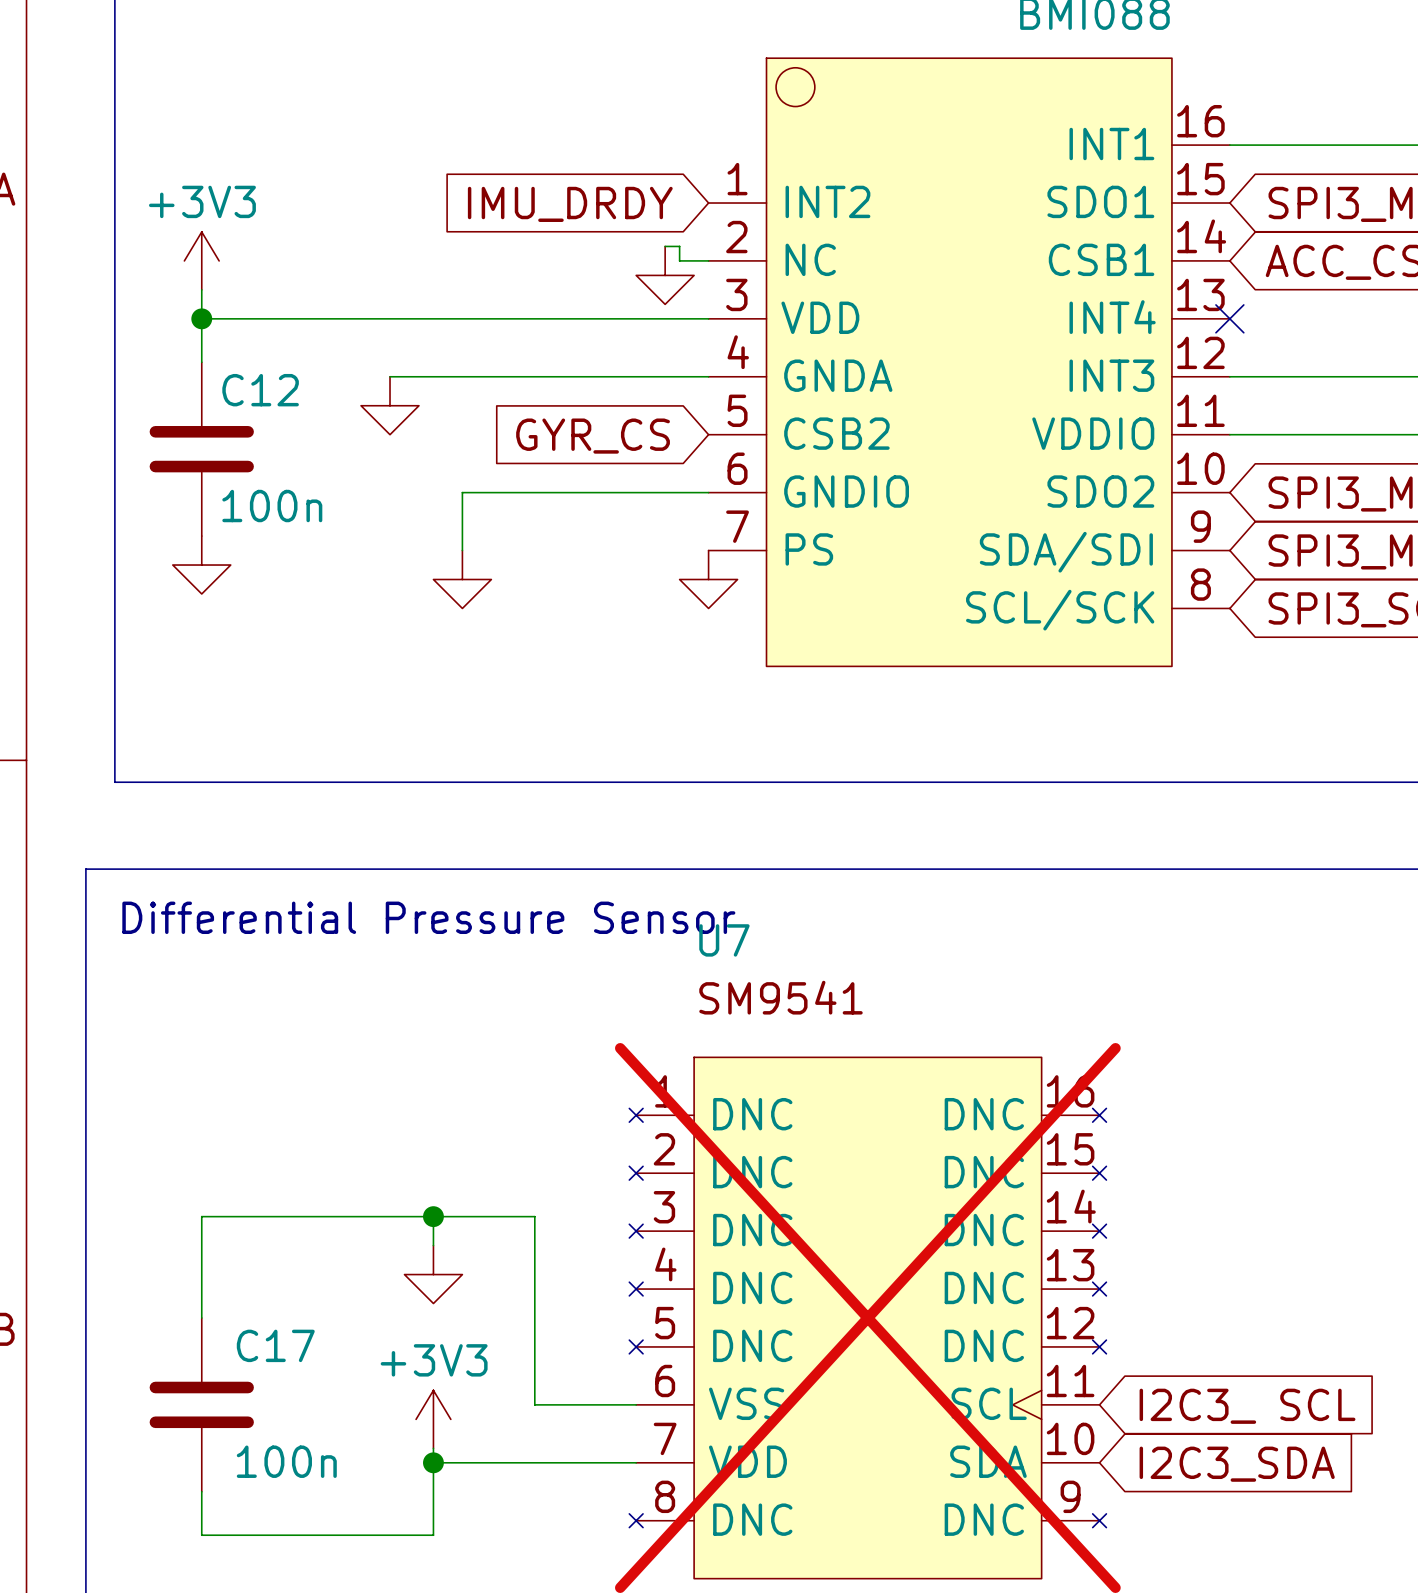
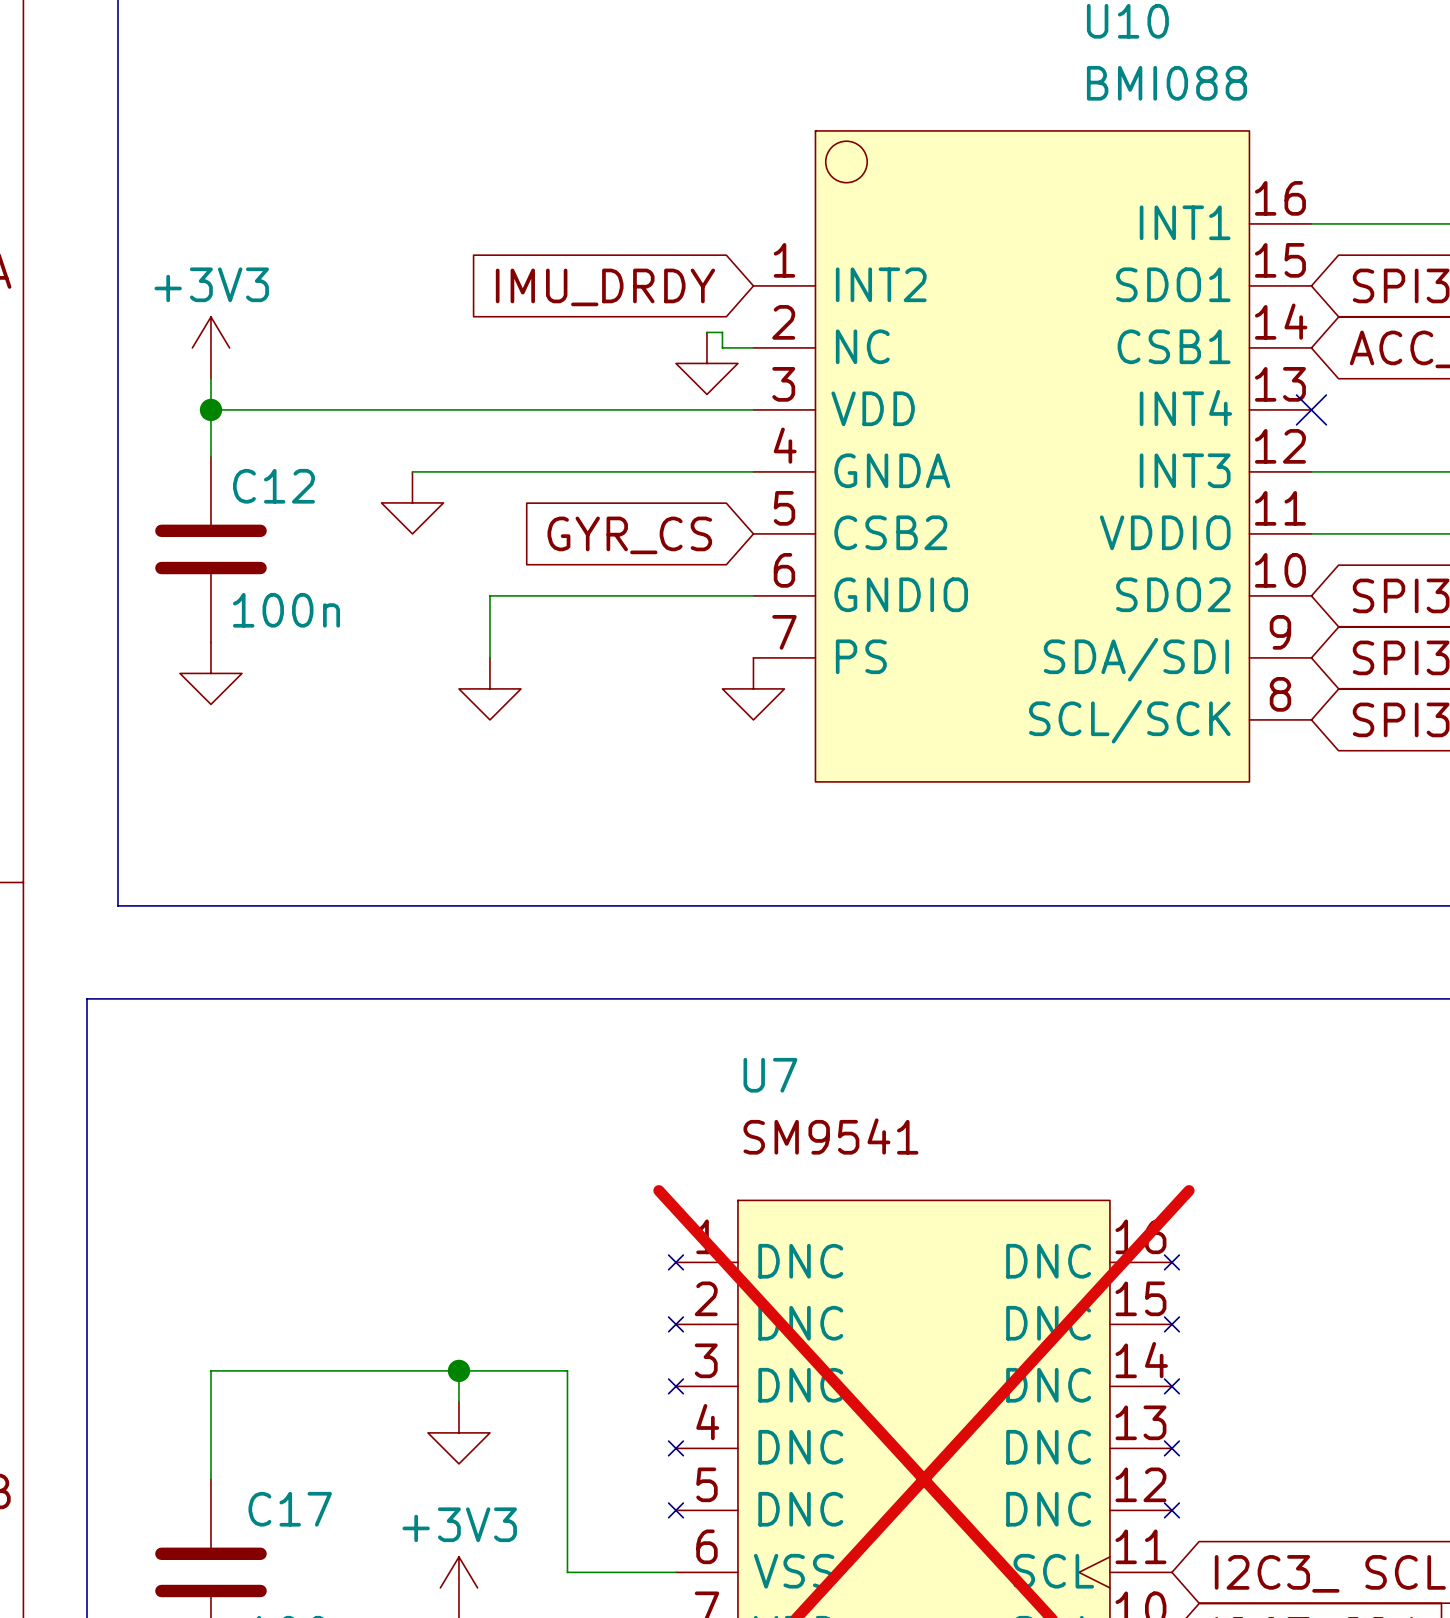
text: Differential Pressure Sensor (428, 917) -> none

